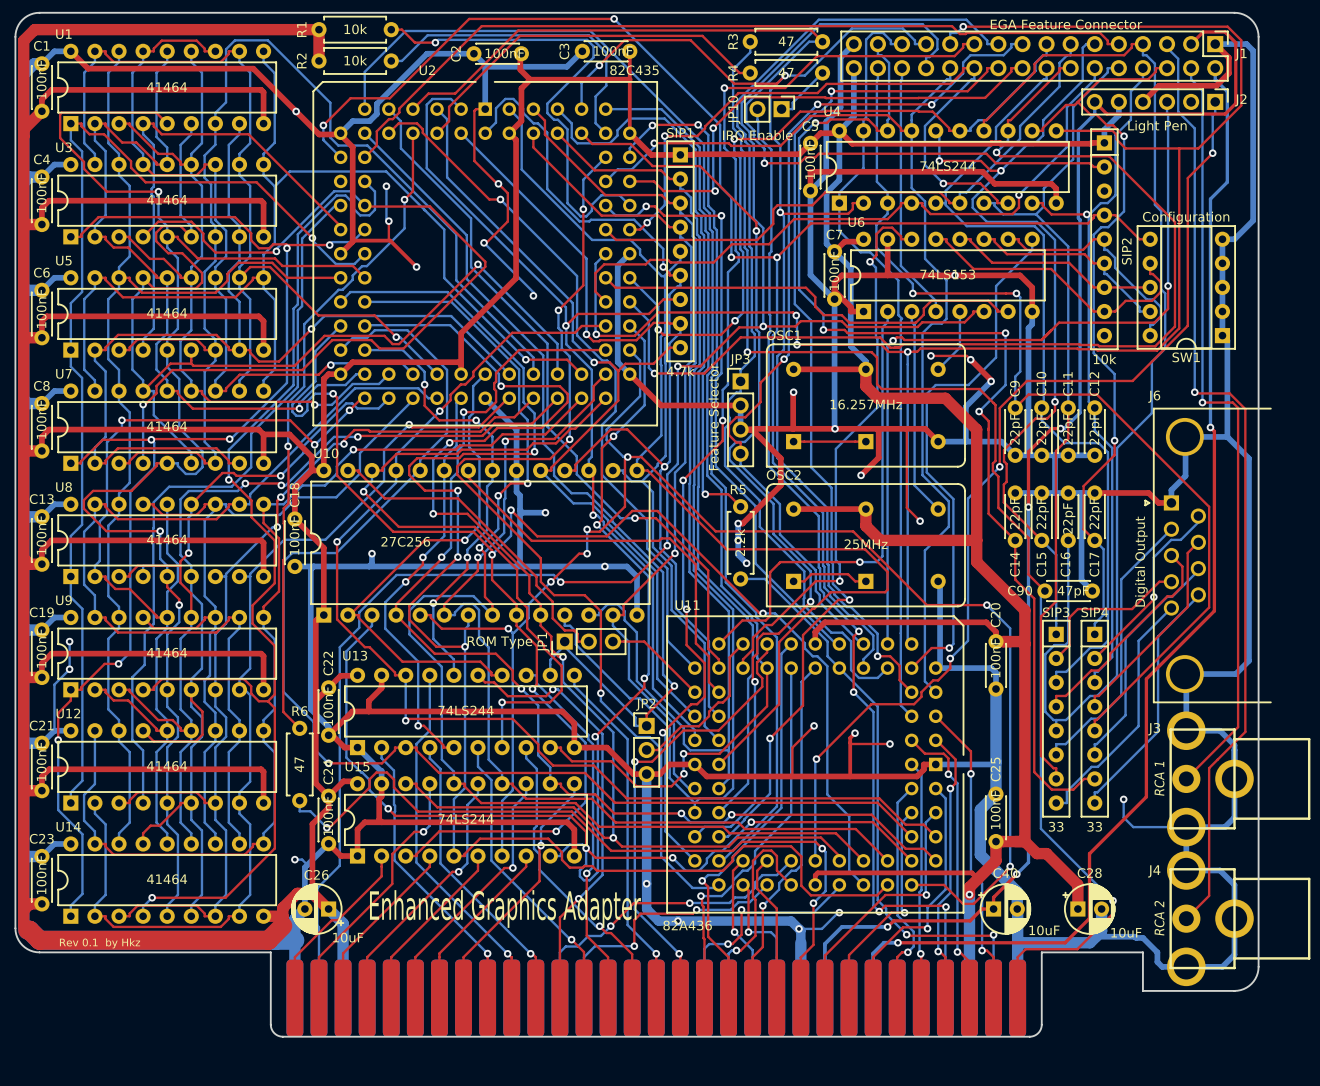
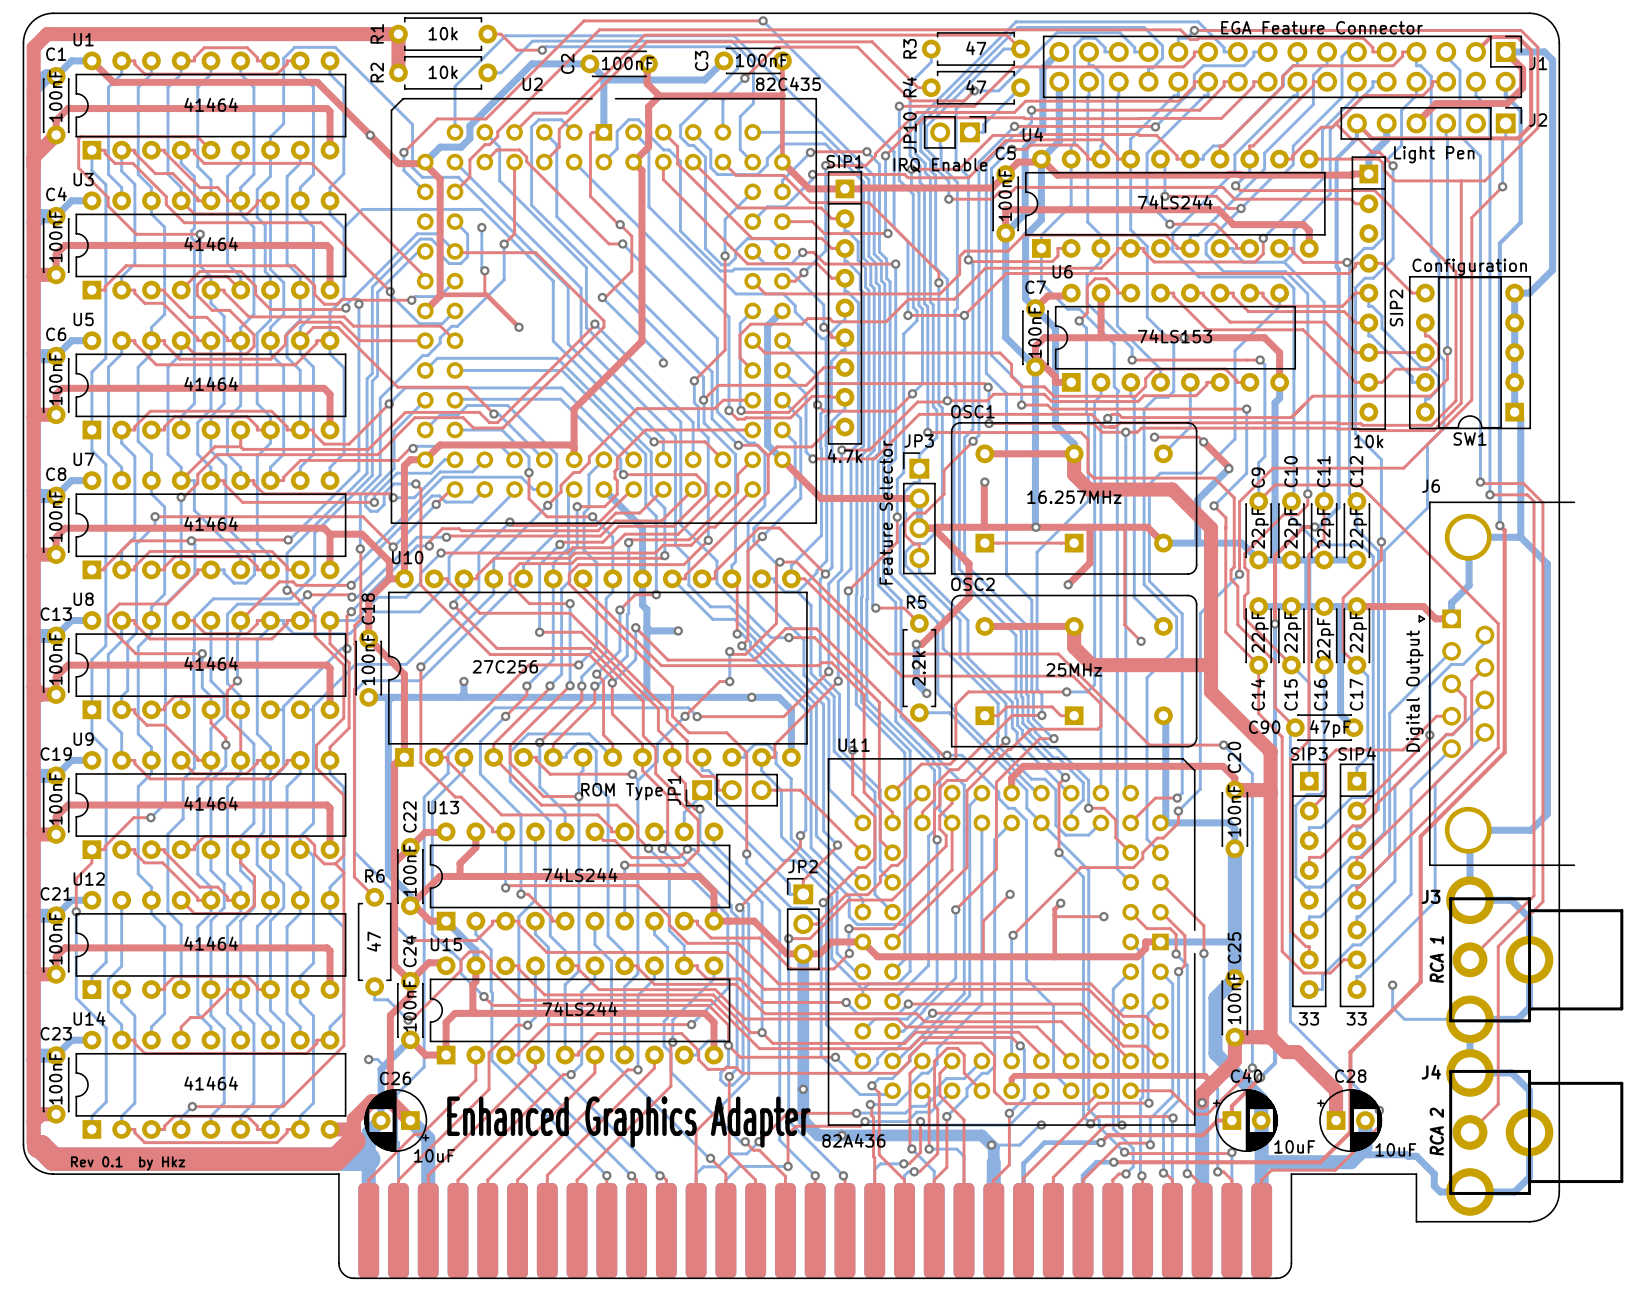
bottom track: (69, 641) (69, 669) (54, 684) (54, 730) -> none
via: (69, 641) -> none
via: (69, 669) -> none

